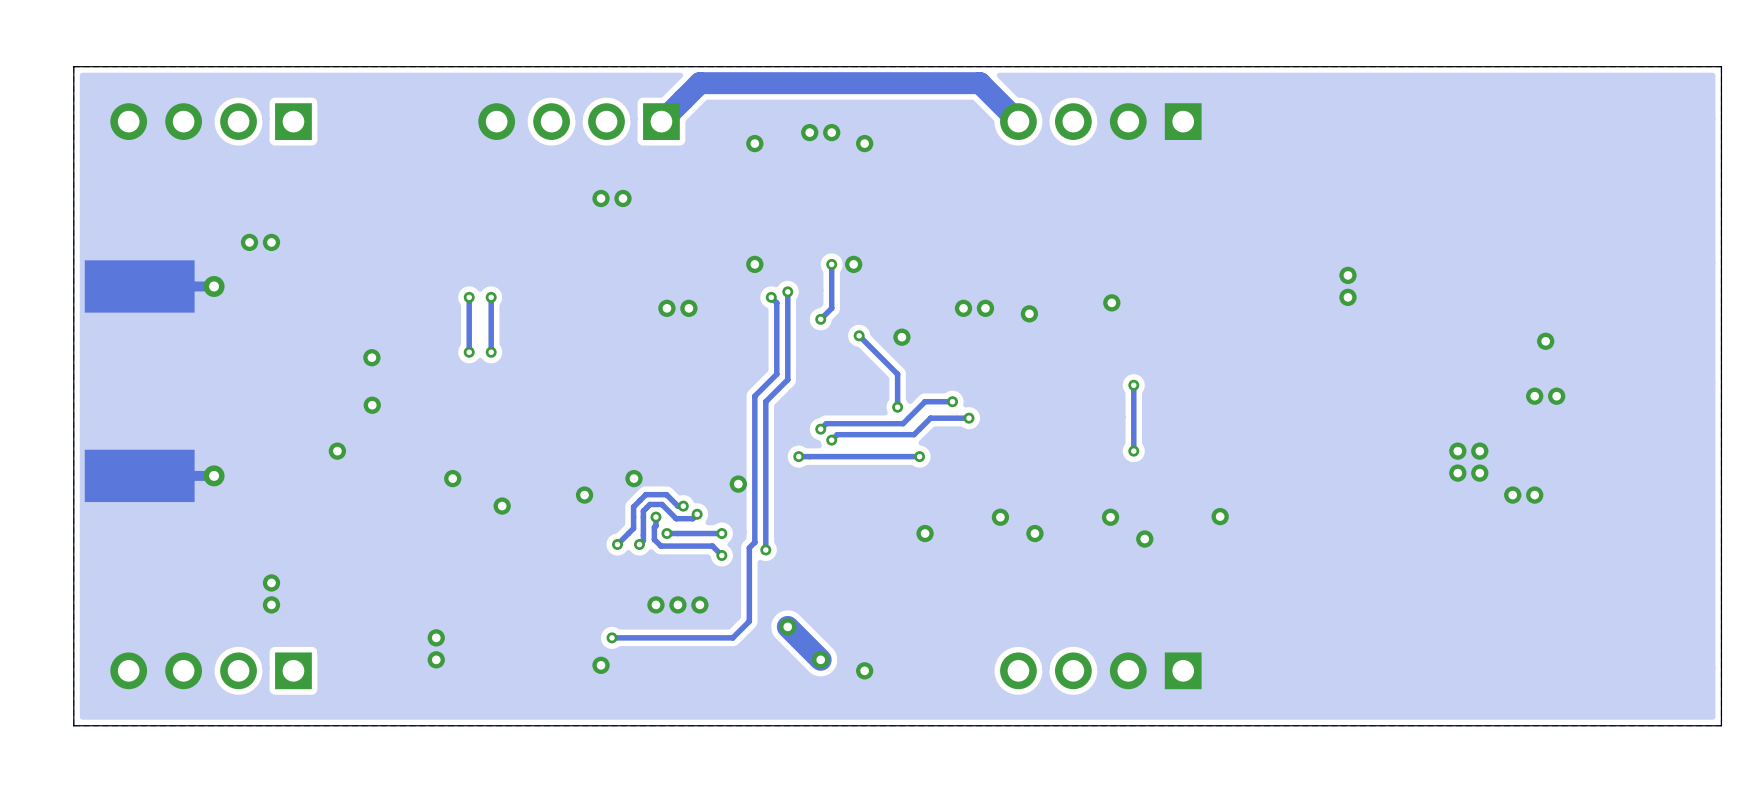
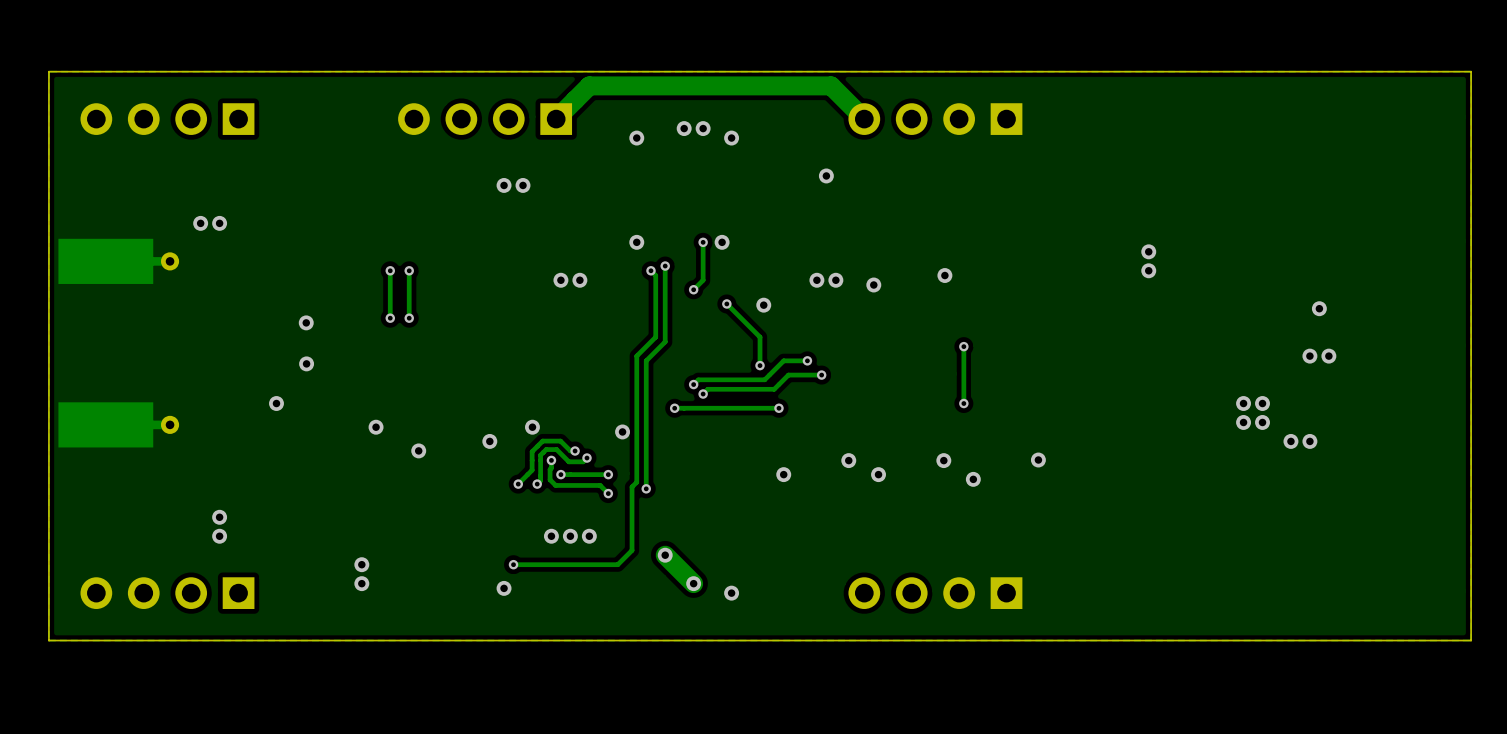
via: none -> (826, 175)

